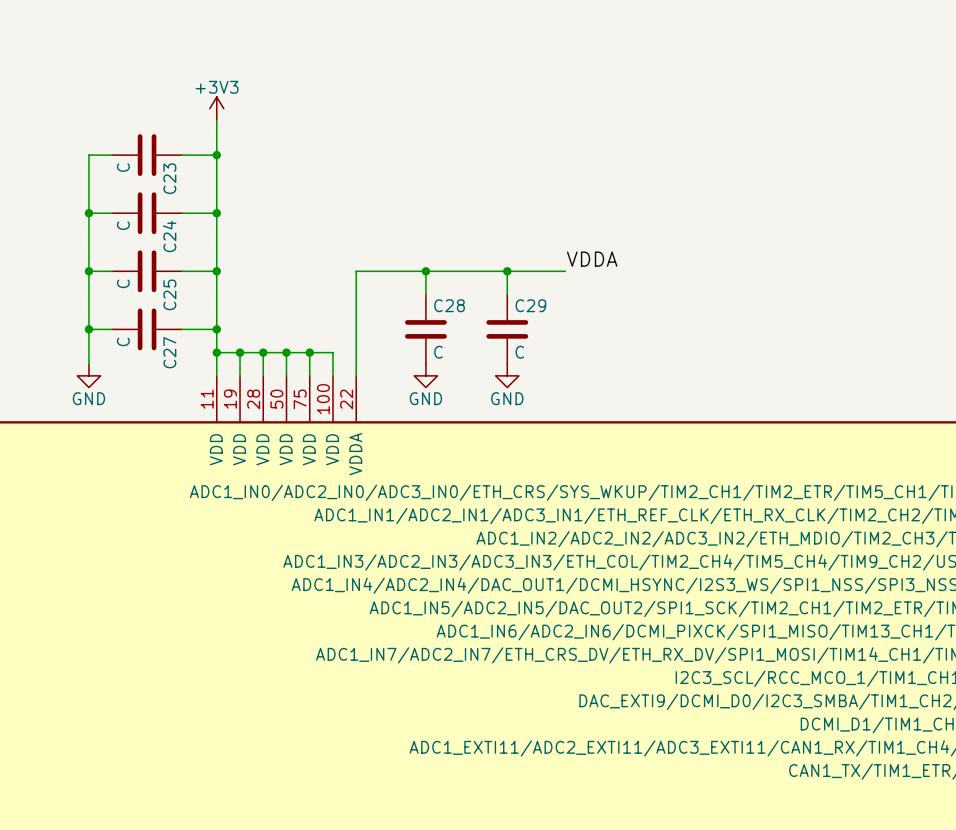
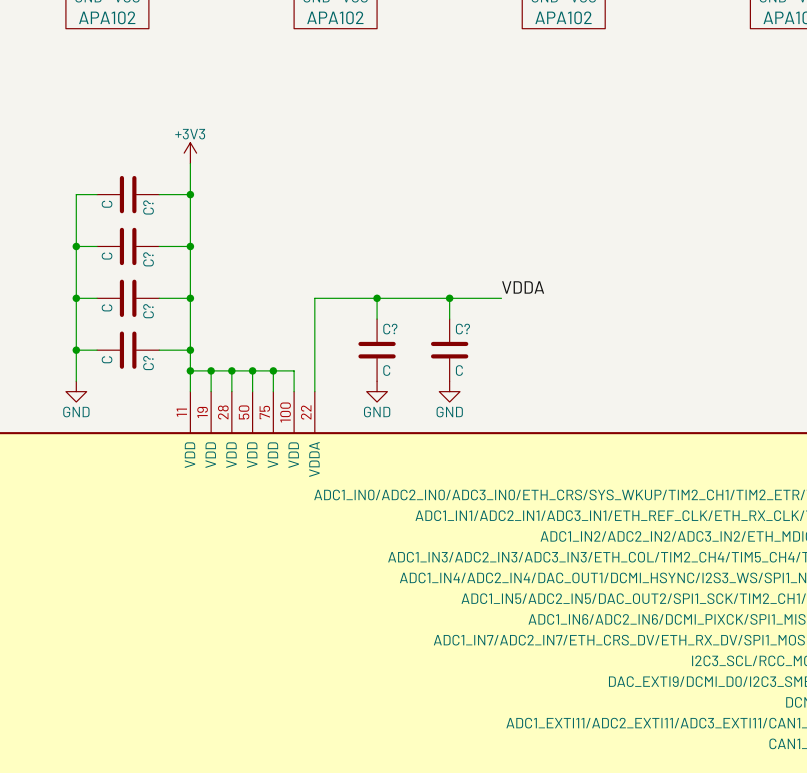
C23 name: C23 (169, 178) -> C? (148, 207)
C24 name: C24 (169, 236) -> C? (148, 259)
C25 name: C25 (169, 294) -> C? (148, 311)
C28 name: C28 (449, 305) -> C? (390, 329)
C29 name: C29 (530, 305) -> C? (462, 329)
C27 name: C27 (169, 352) -> C? (148, 363)

